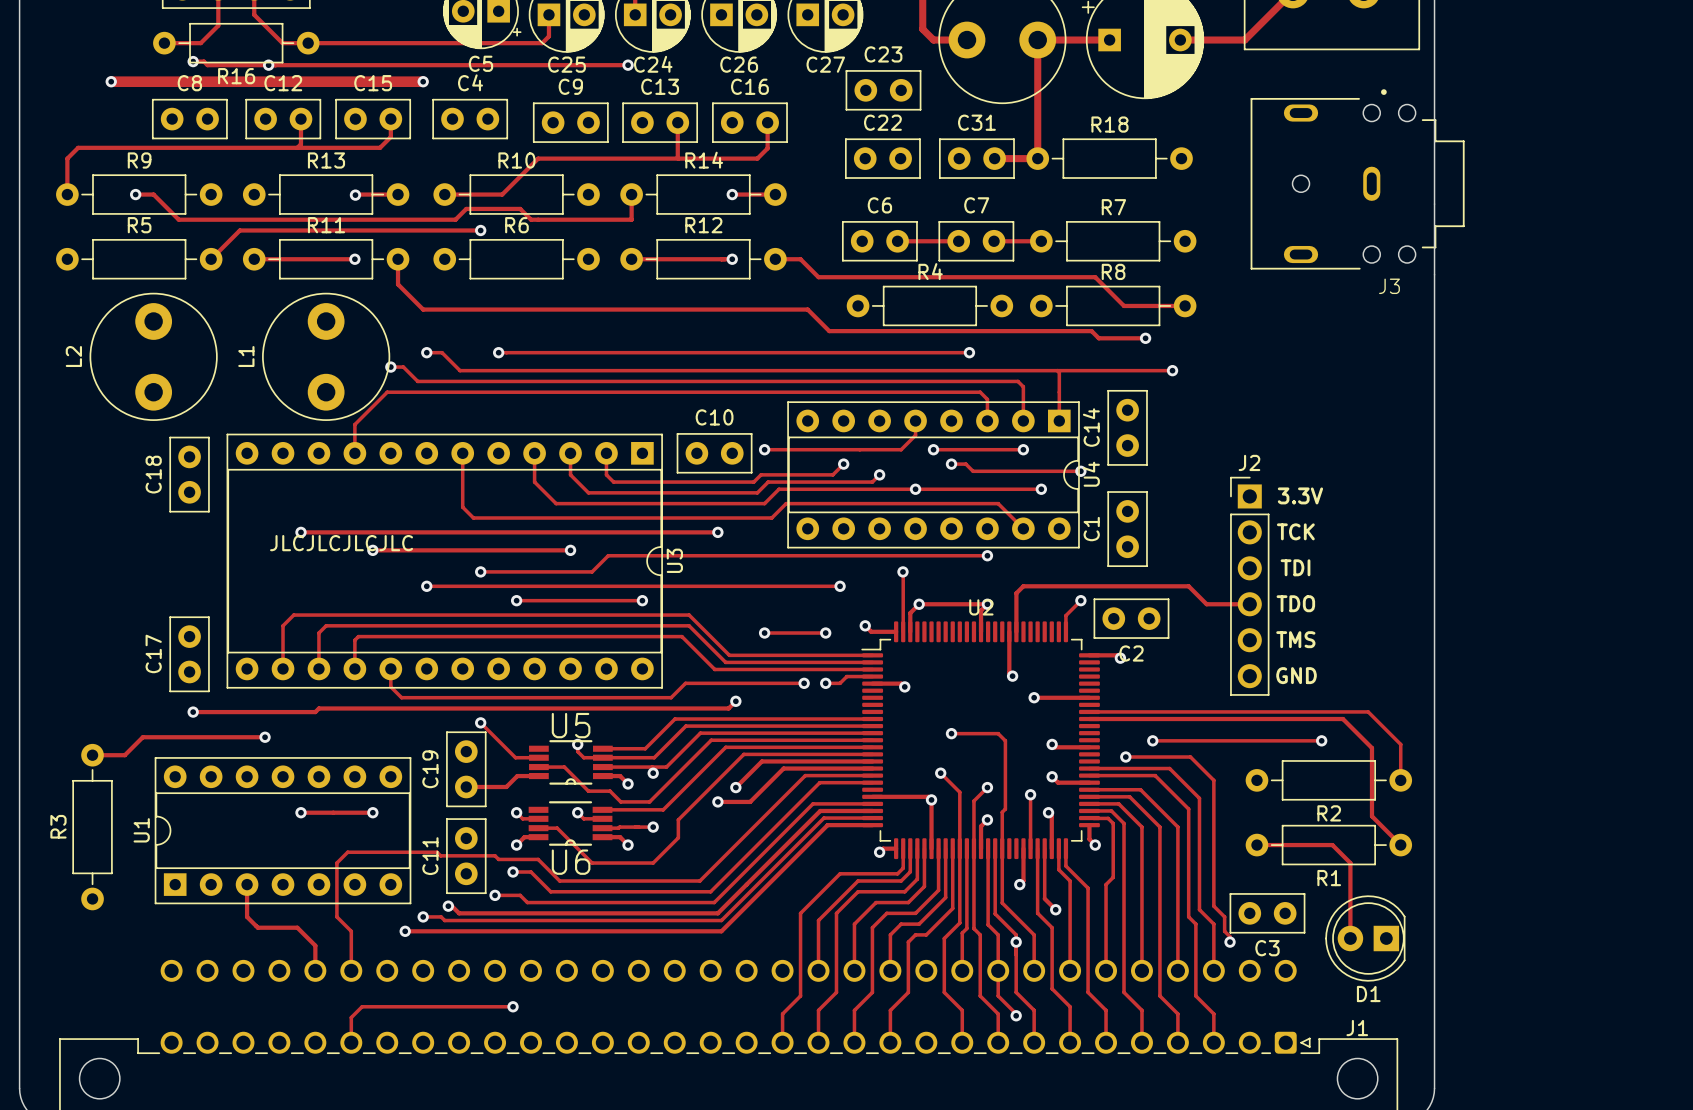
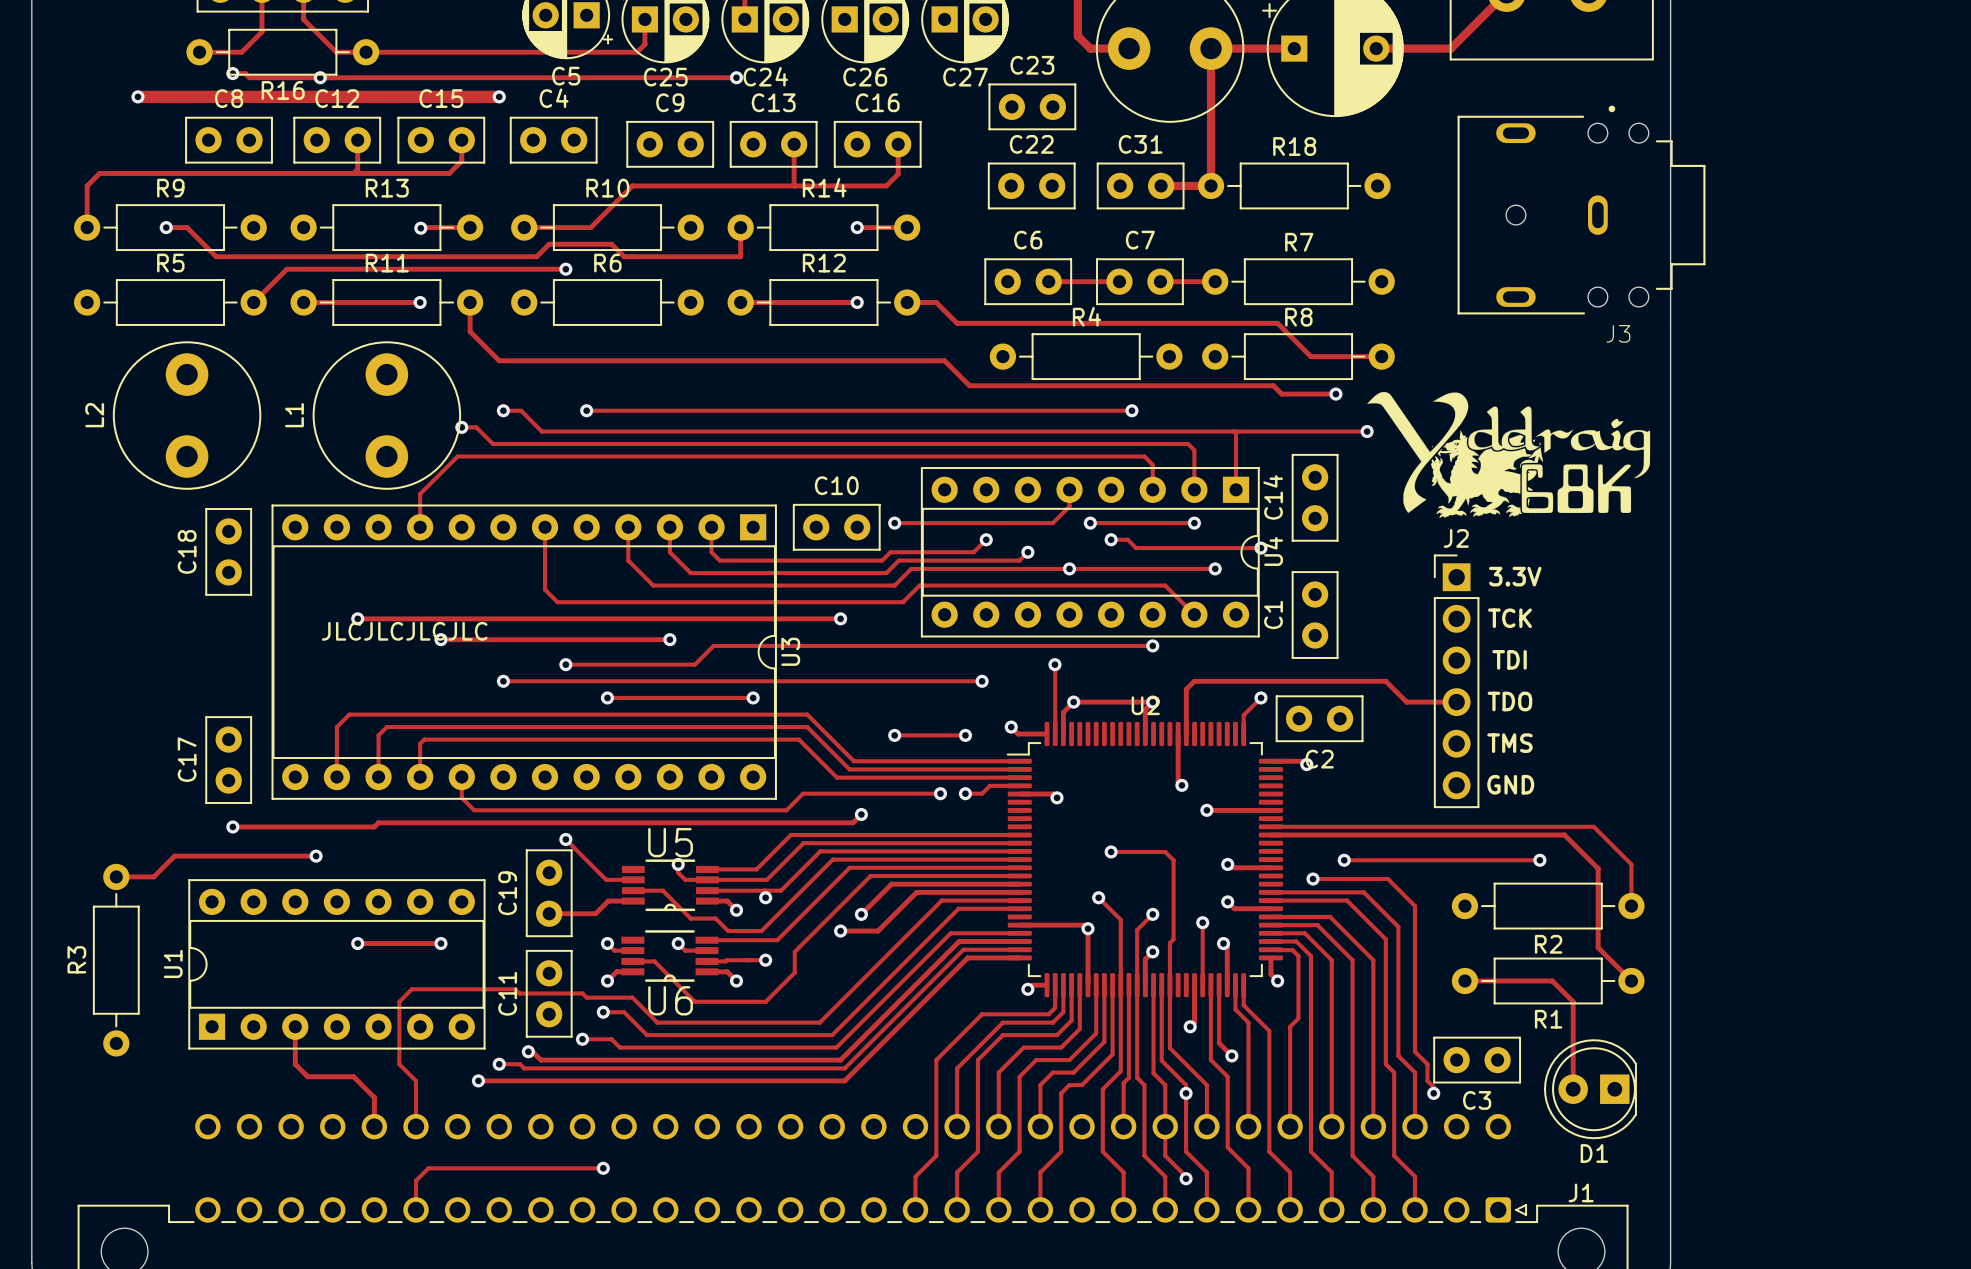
drawing: none -> [1367, 391, 1651, 519]

